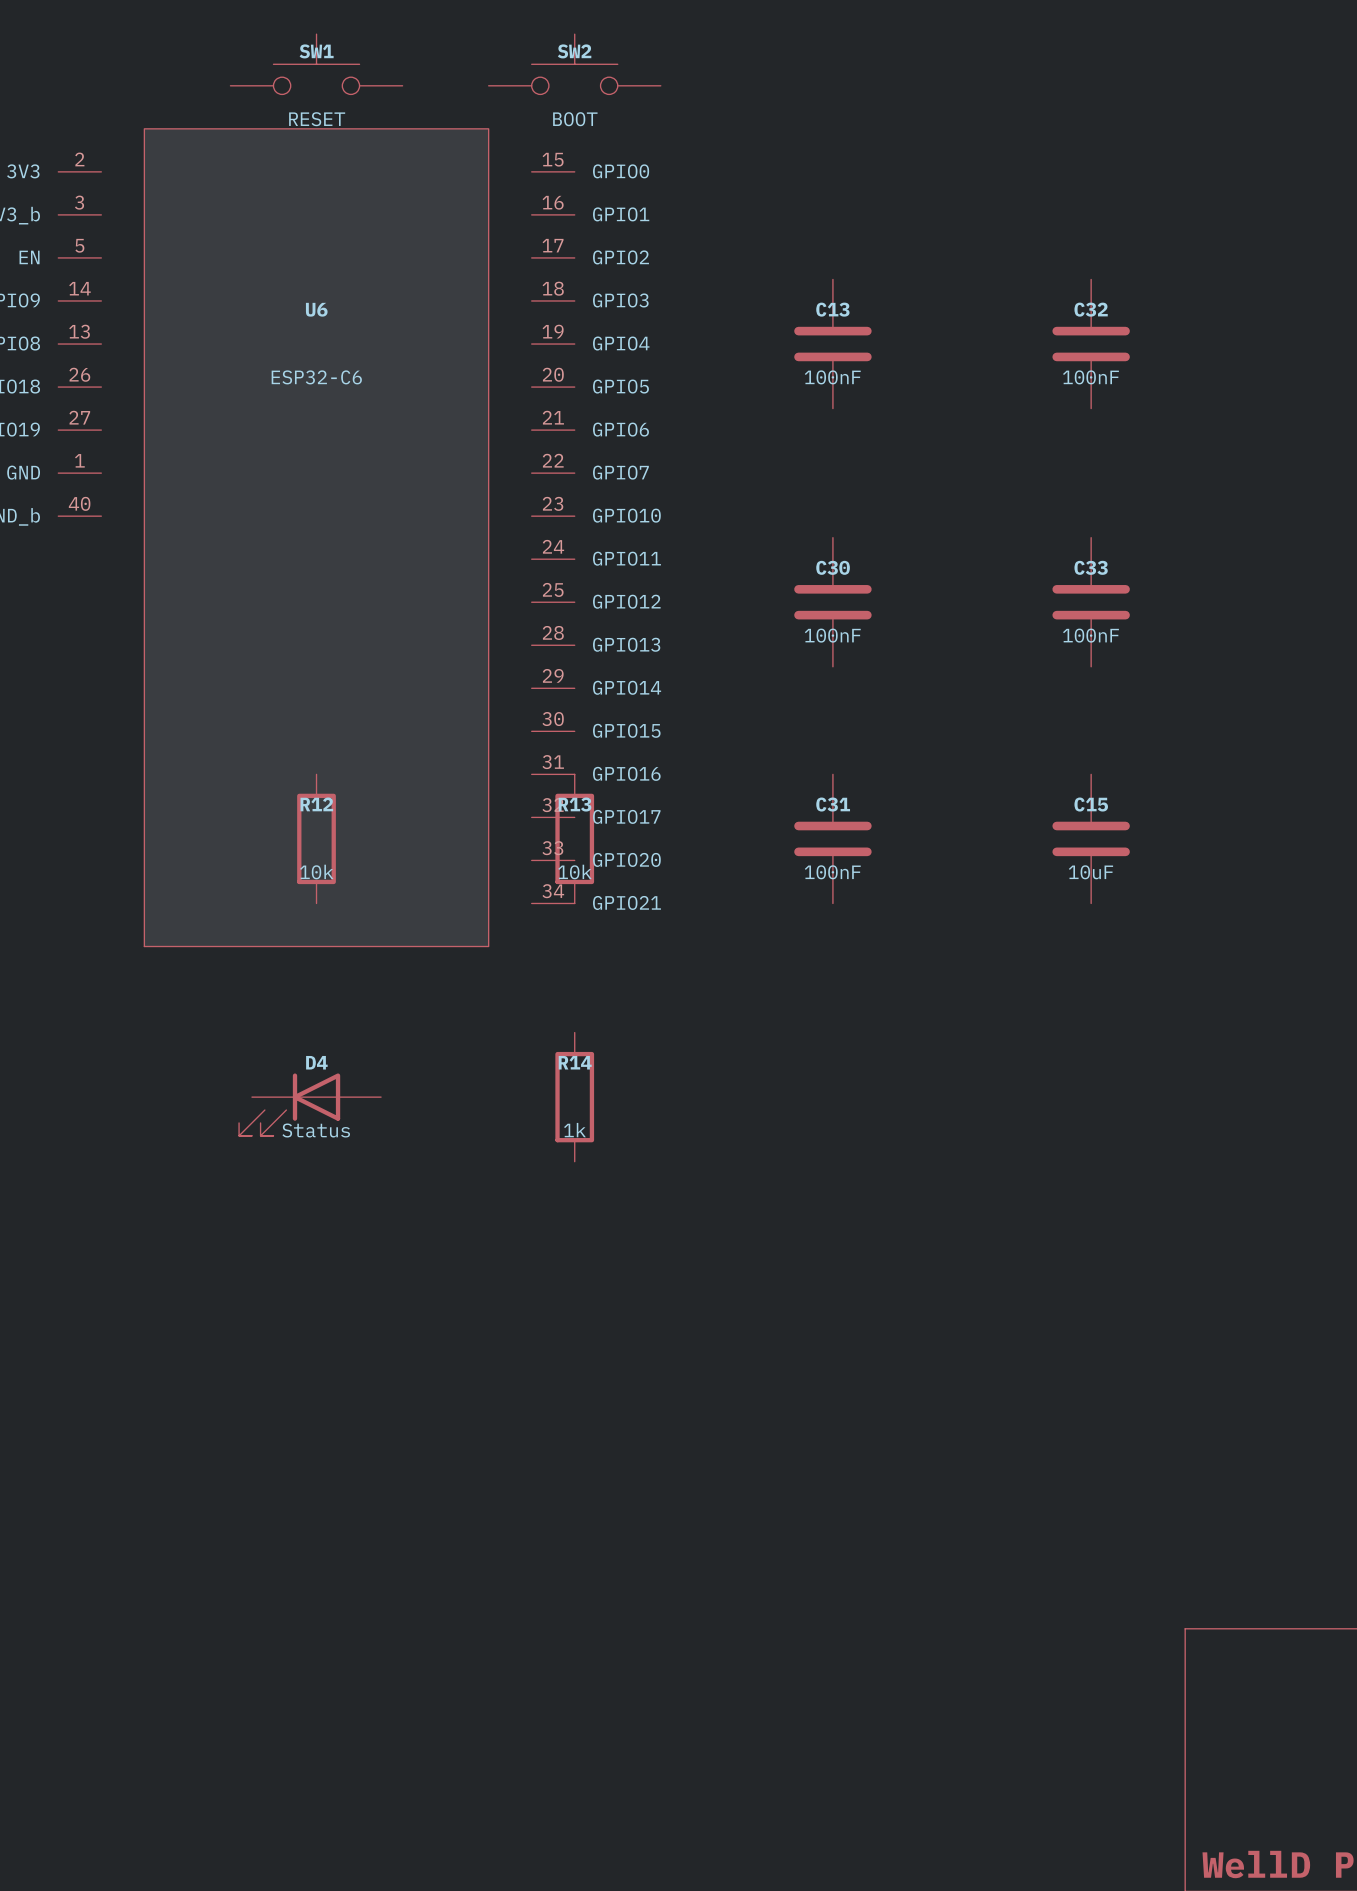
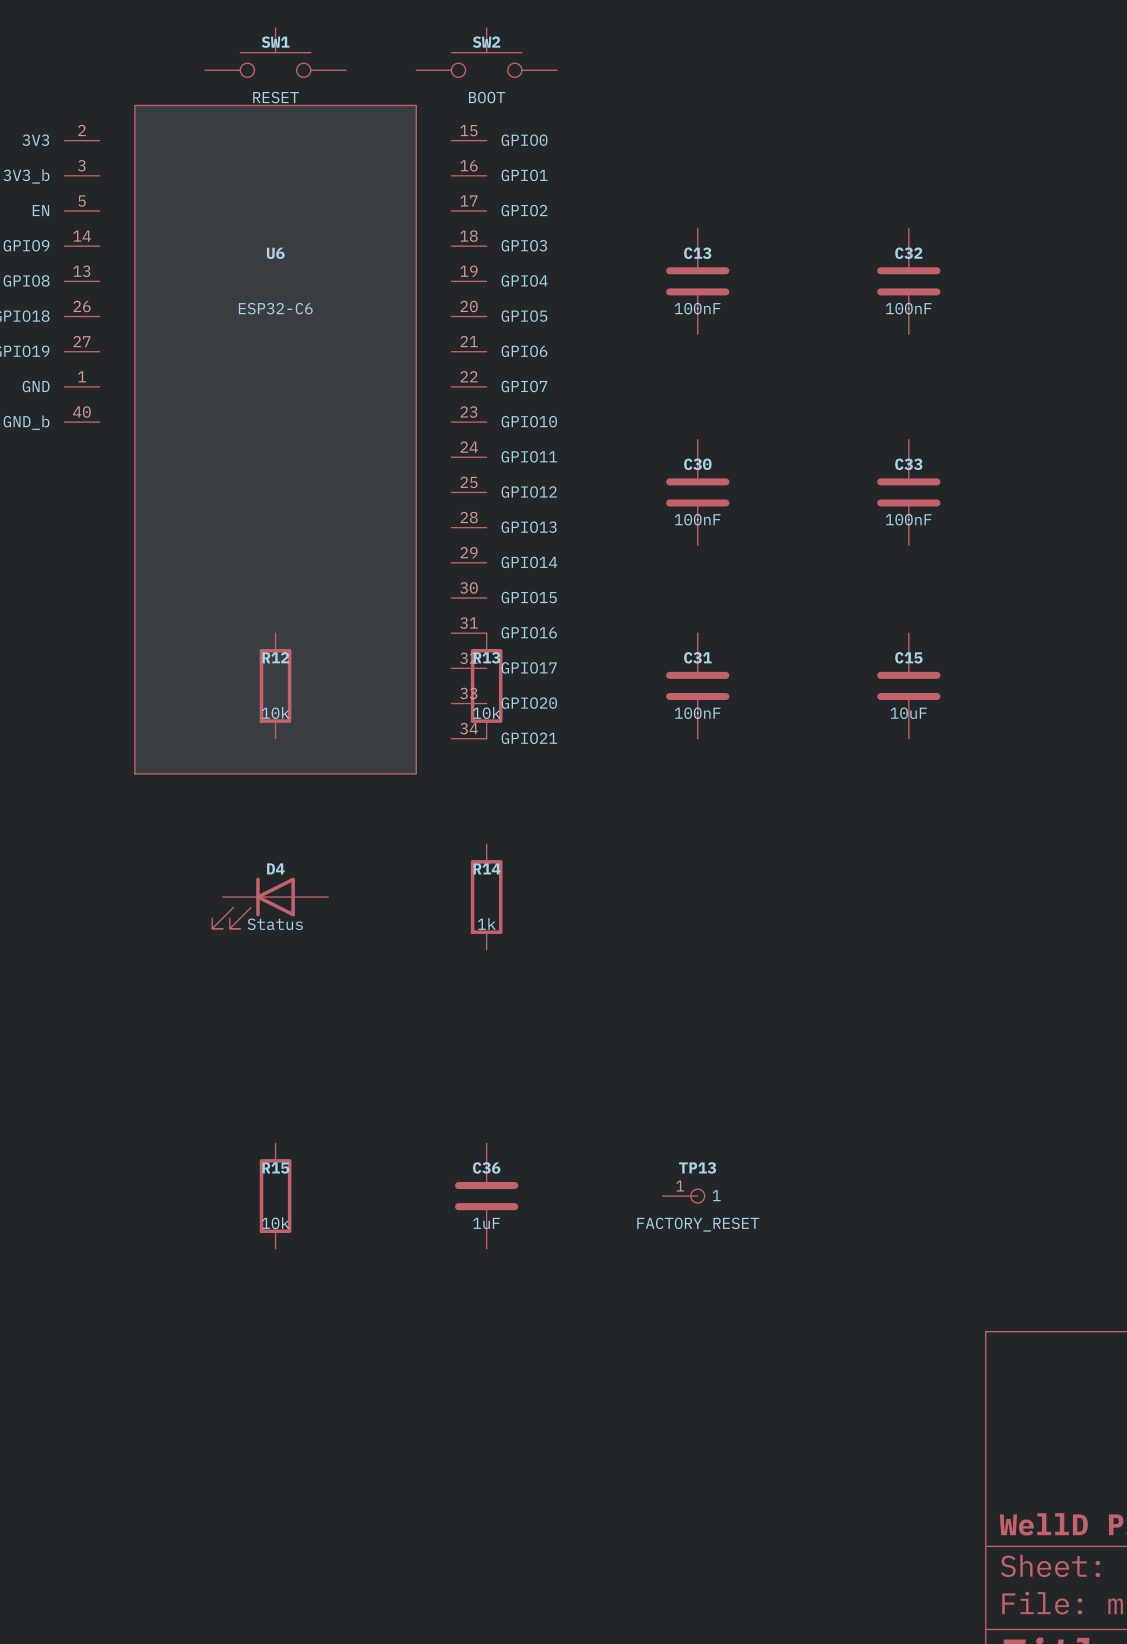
R15: none -> 10k (275, 1196)
C36: none -> 1uF (486, 1196)
TP13: none -> FACTORY_RESET (683, 1196)

